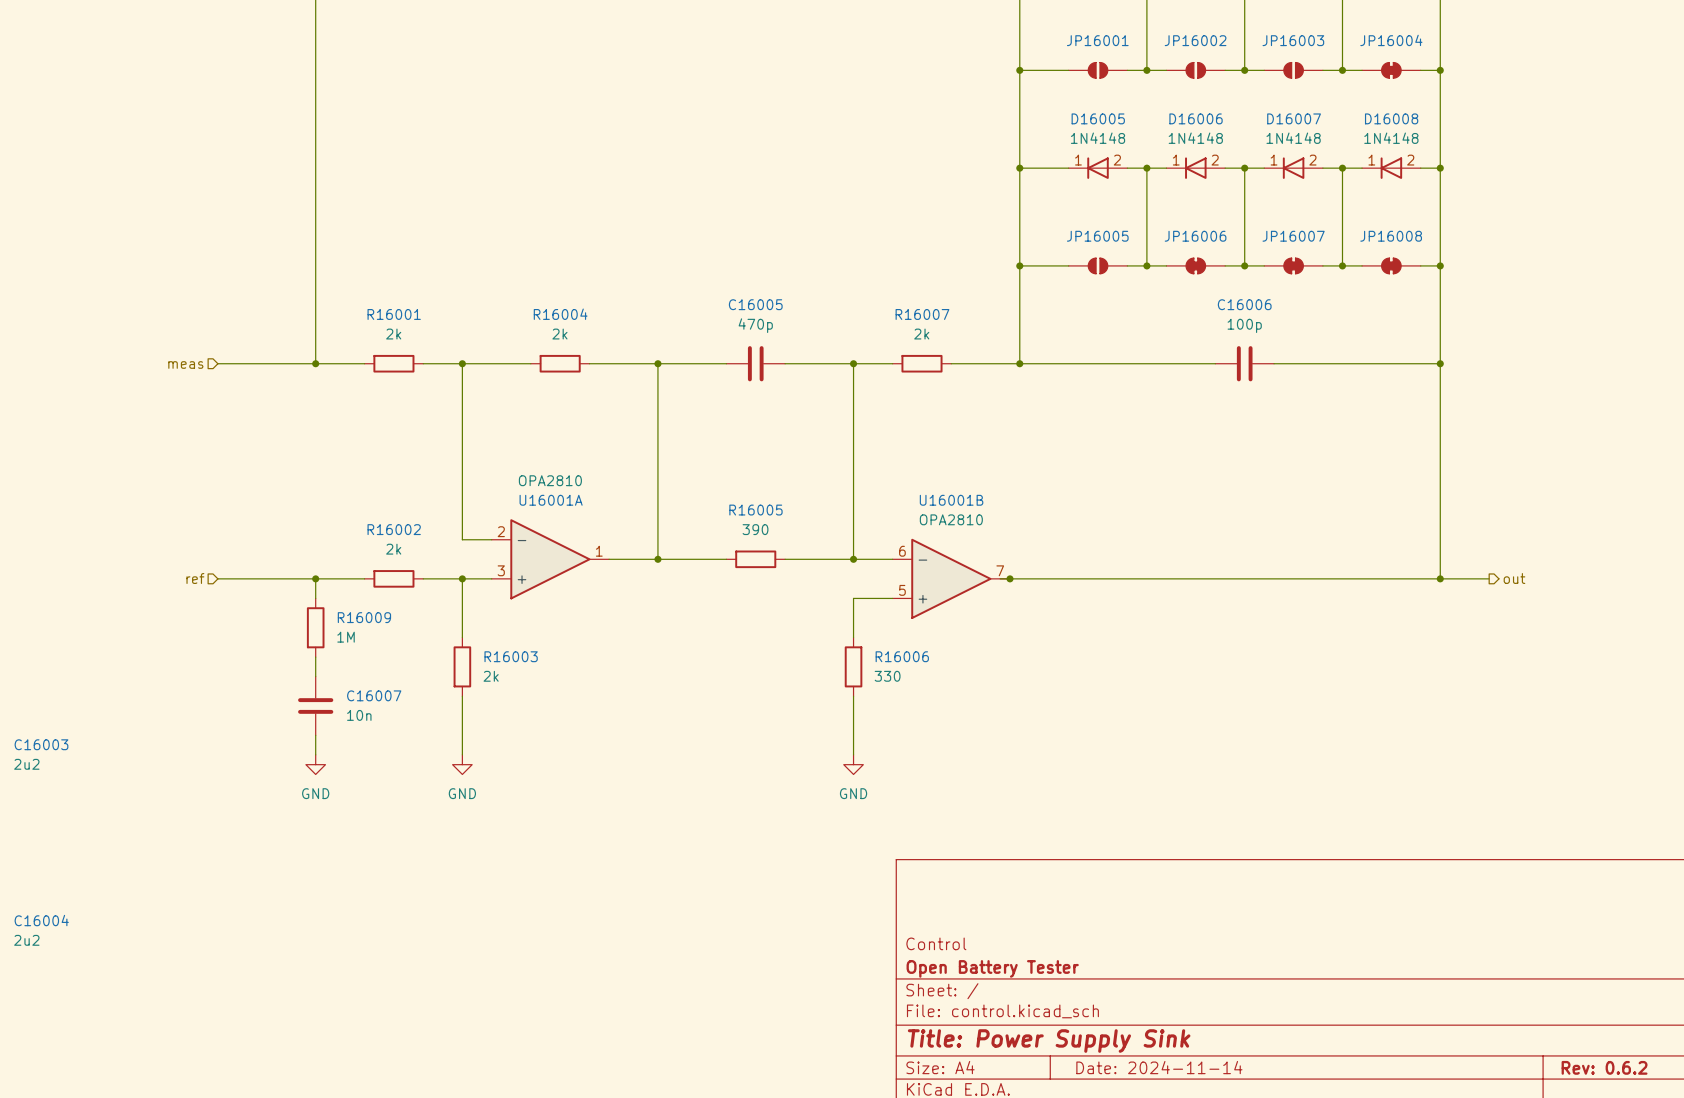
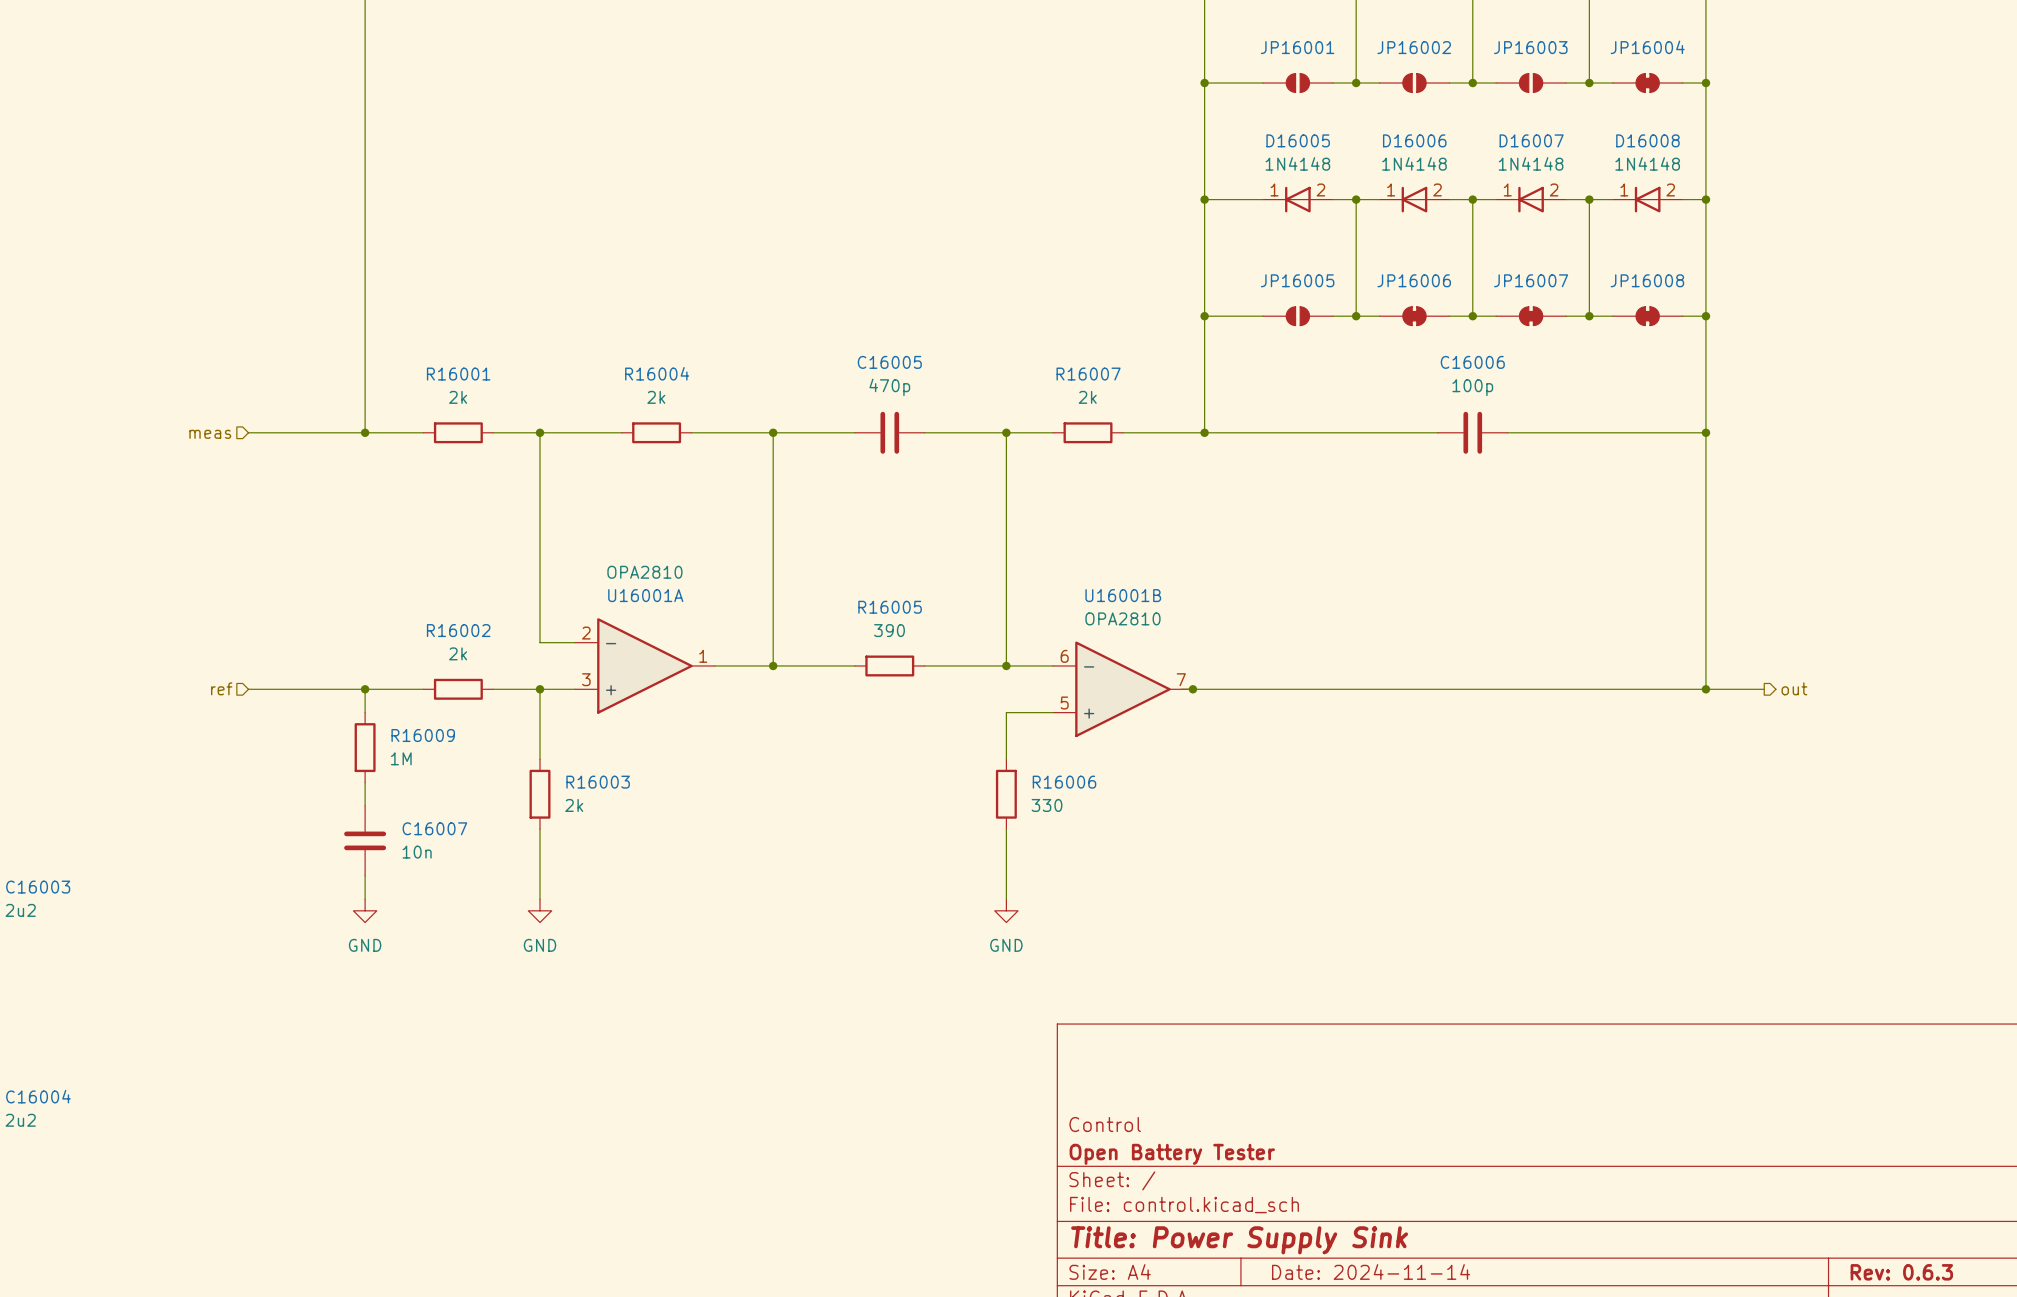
title block: Rev: 0.6.2 (1604, 1067) -> Rev: 0.6.3 (1901, 1272)

